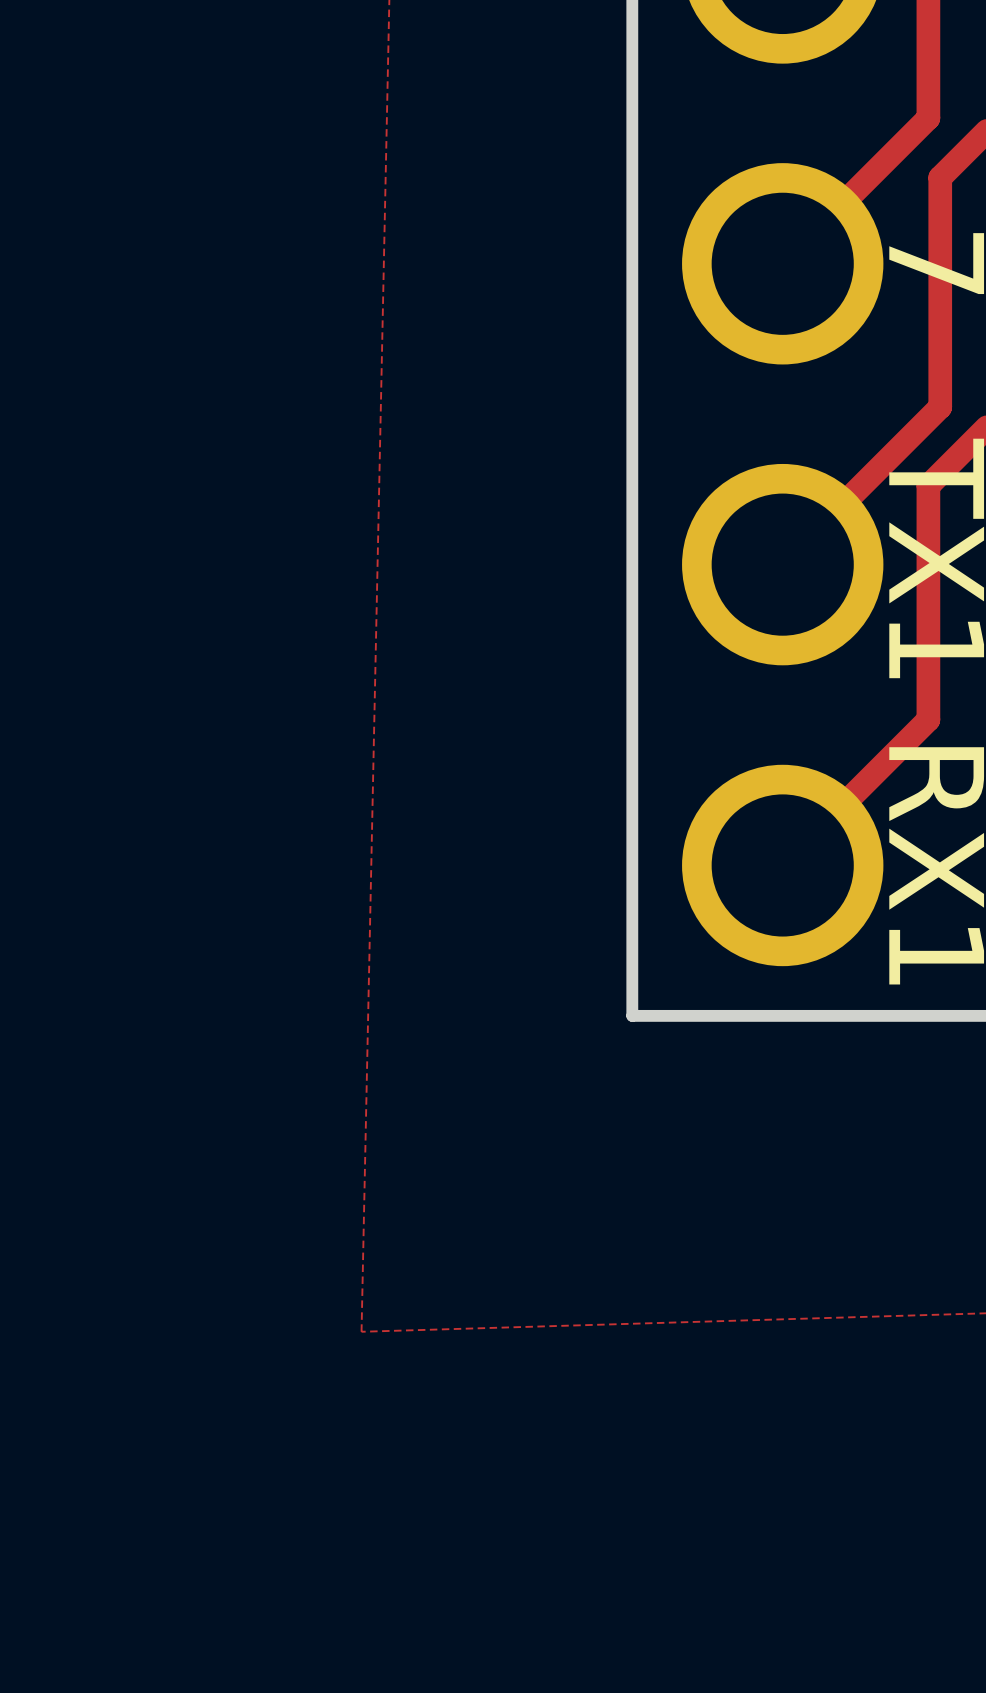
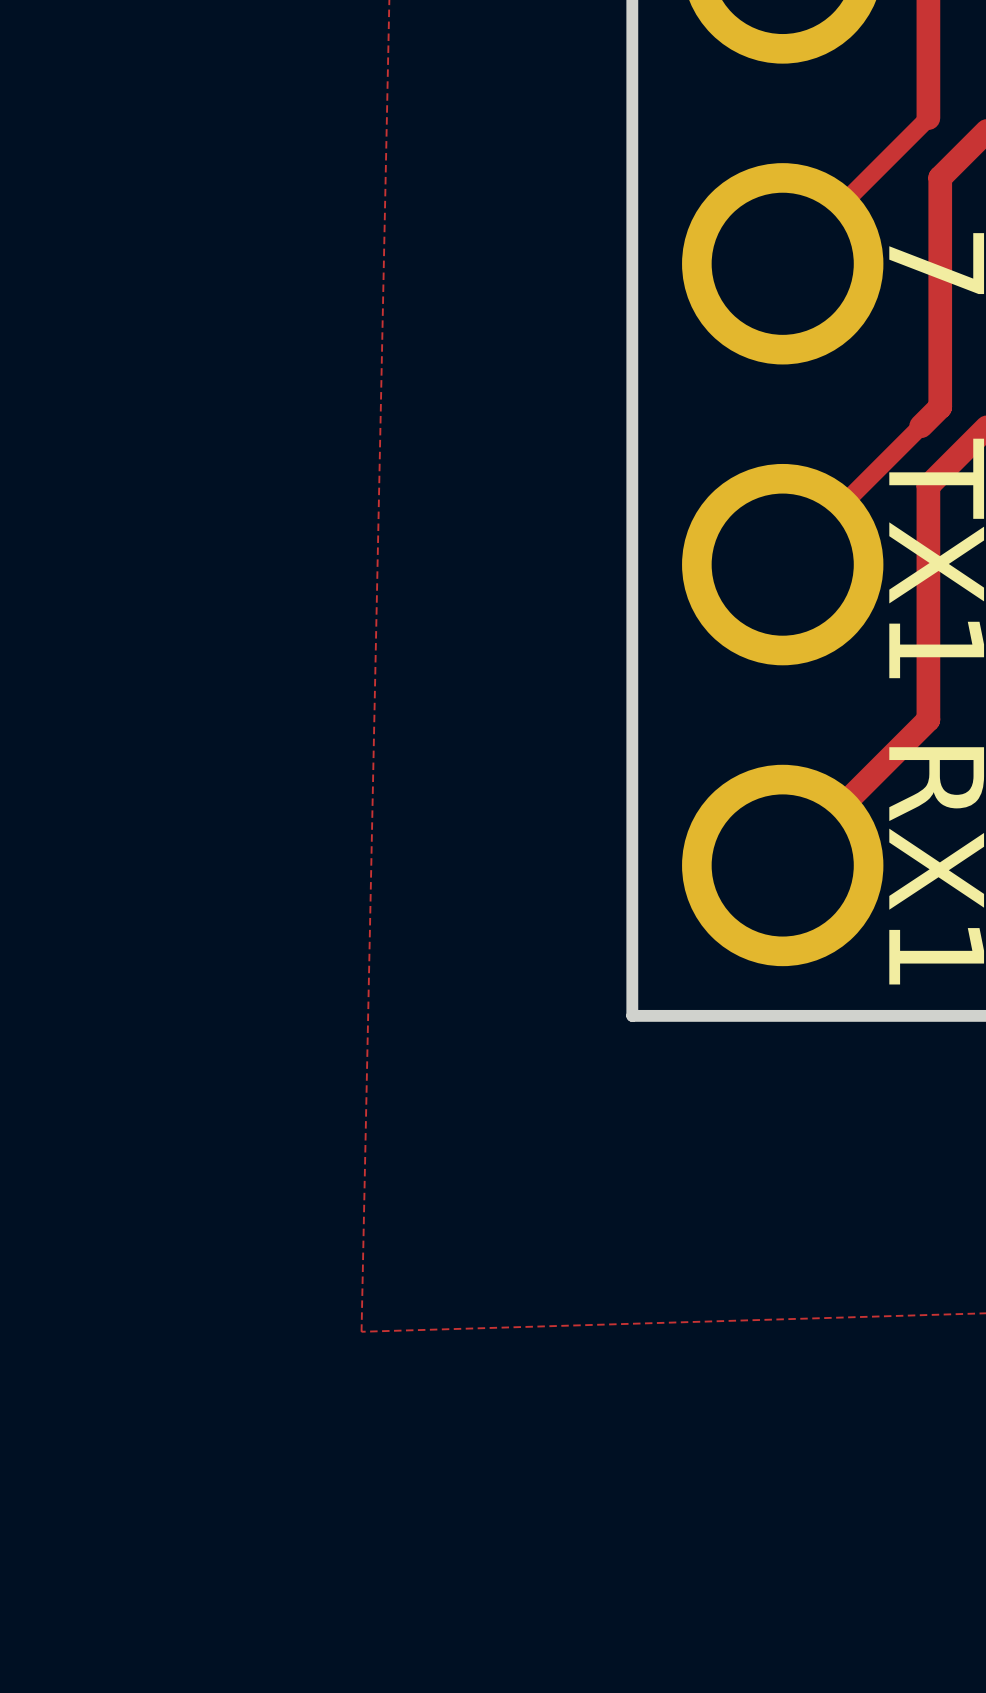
track width: thick (928, 118) (782, 263) -> thin (928, 118) (782, 263)
track width: thick (921, 426) (782, 564) -> thin (921, 426) (782, 564)

